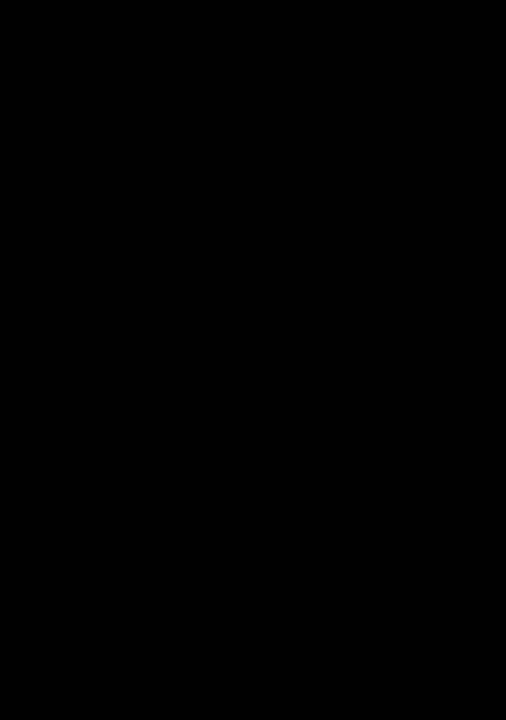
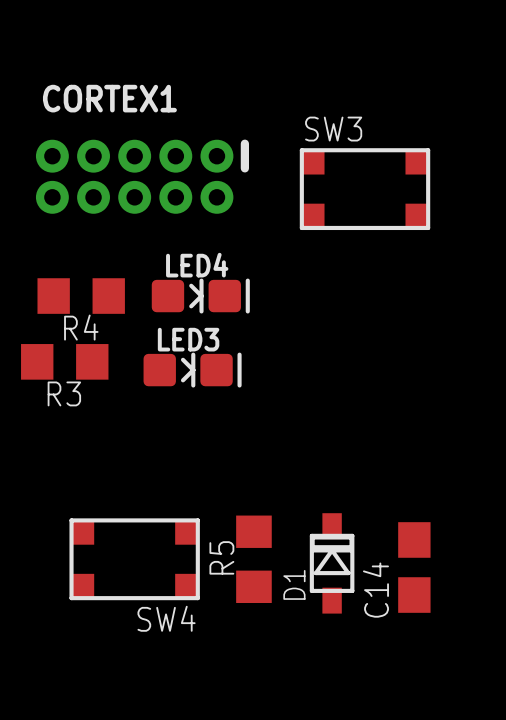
CORTEX1: none -> (142, 176)
SW3: none -> (365, 189)
R4: none -> (81, 296)
LED4: none -> (200, 296)
R3: none -> (64, 361)
LED3: none -> (192, 370)
SW4: none -> (134, 559)
R5: none -> (253, 559)
D1: none -> (332, 563)
C14: none -> (414, 567)

